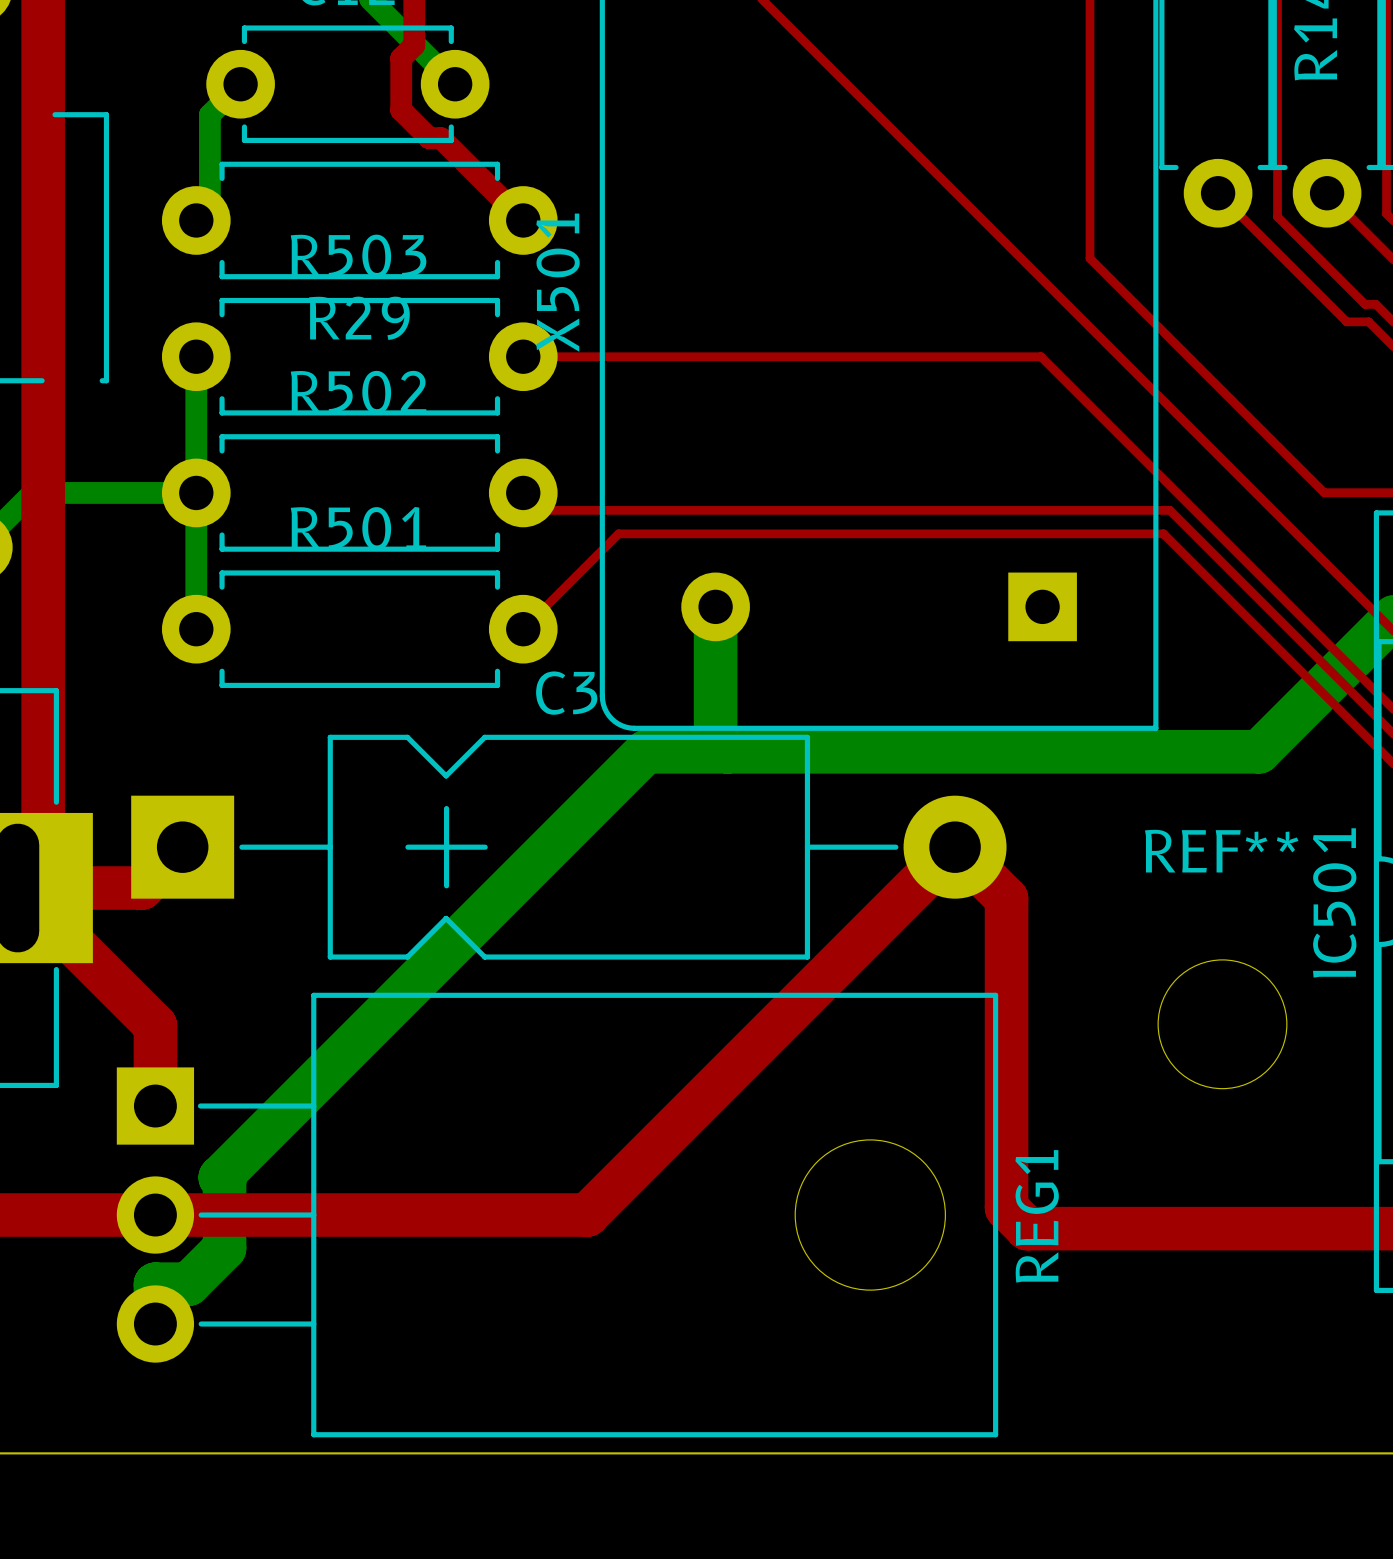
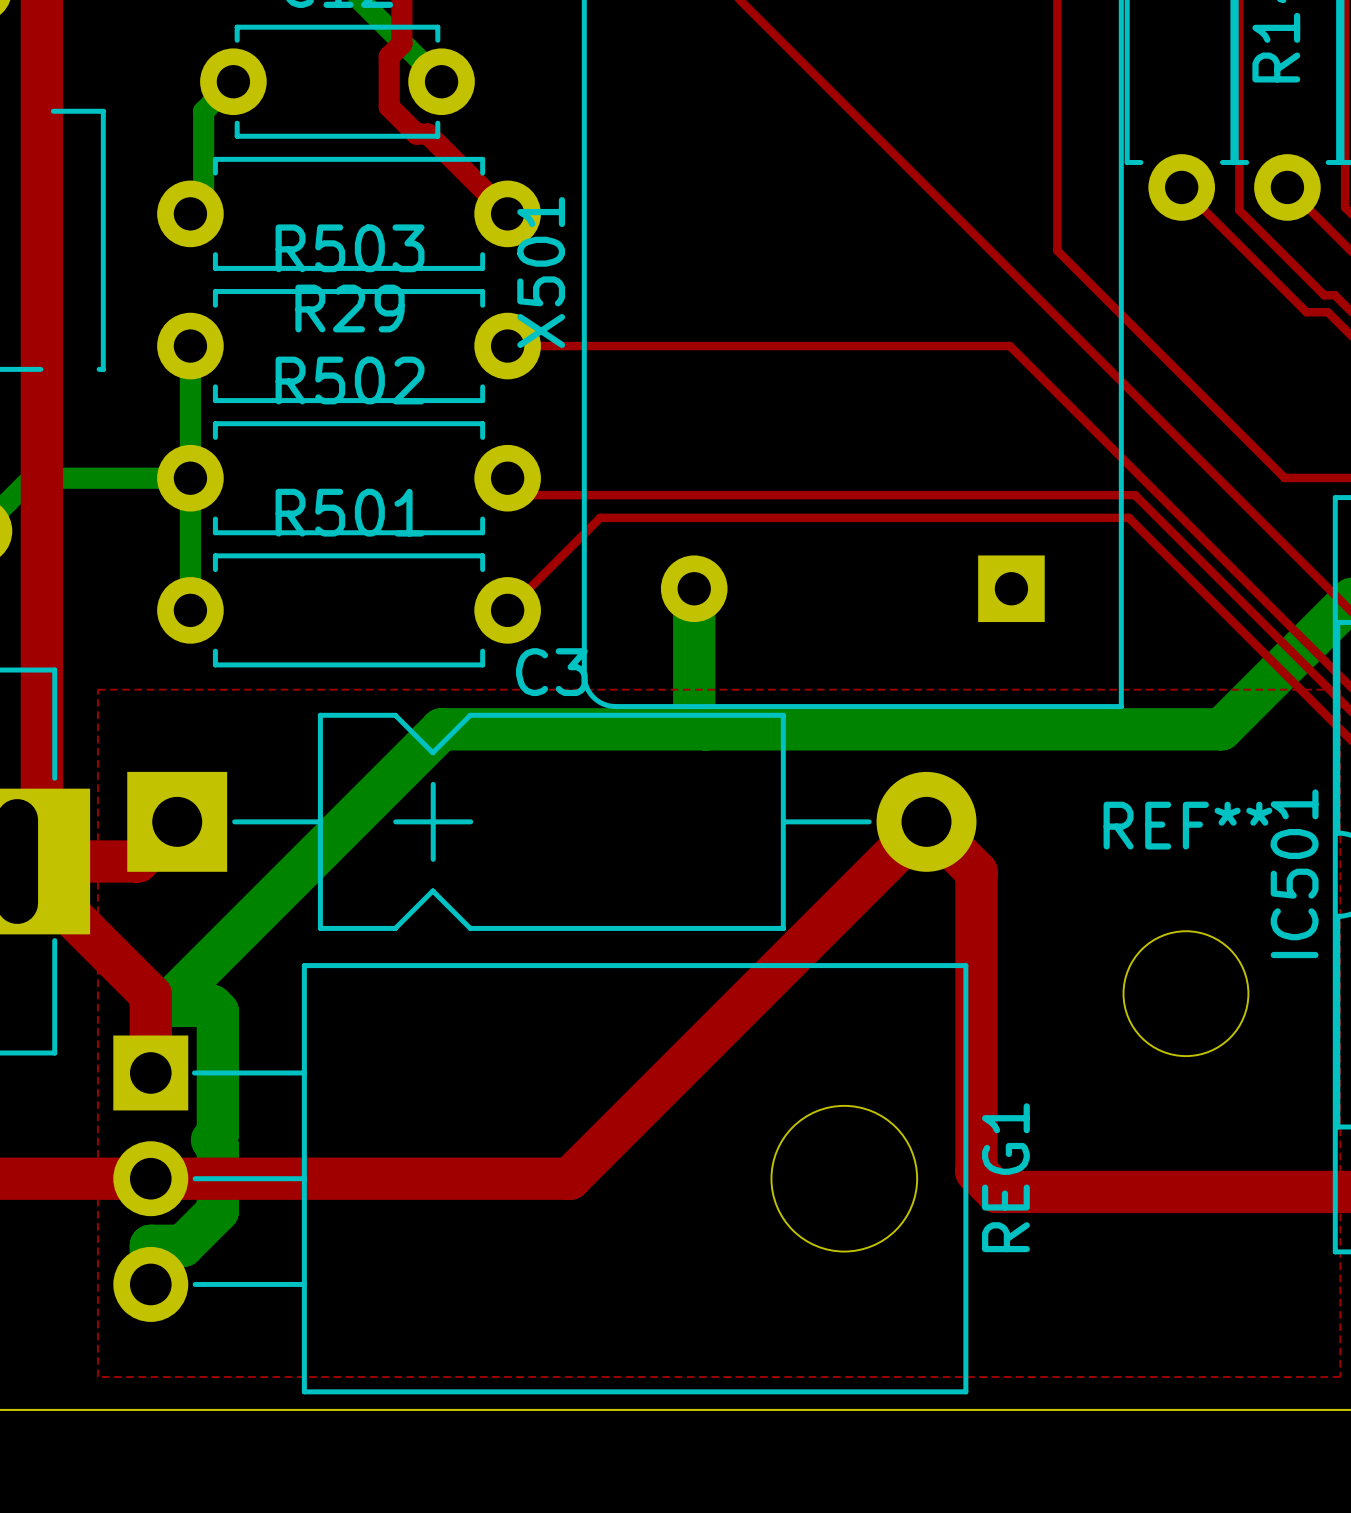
top zone outline: none -> (97, 689) (97, 1376) (1340, 1376) (1340, 689) (97, 689)
bottom track: (645, 751) (220, 1177) -> (626, 729) (441, 729) (164, 1005) (211, 1005) (217, 1011) (217, 1134) (211, 1140)

